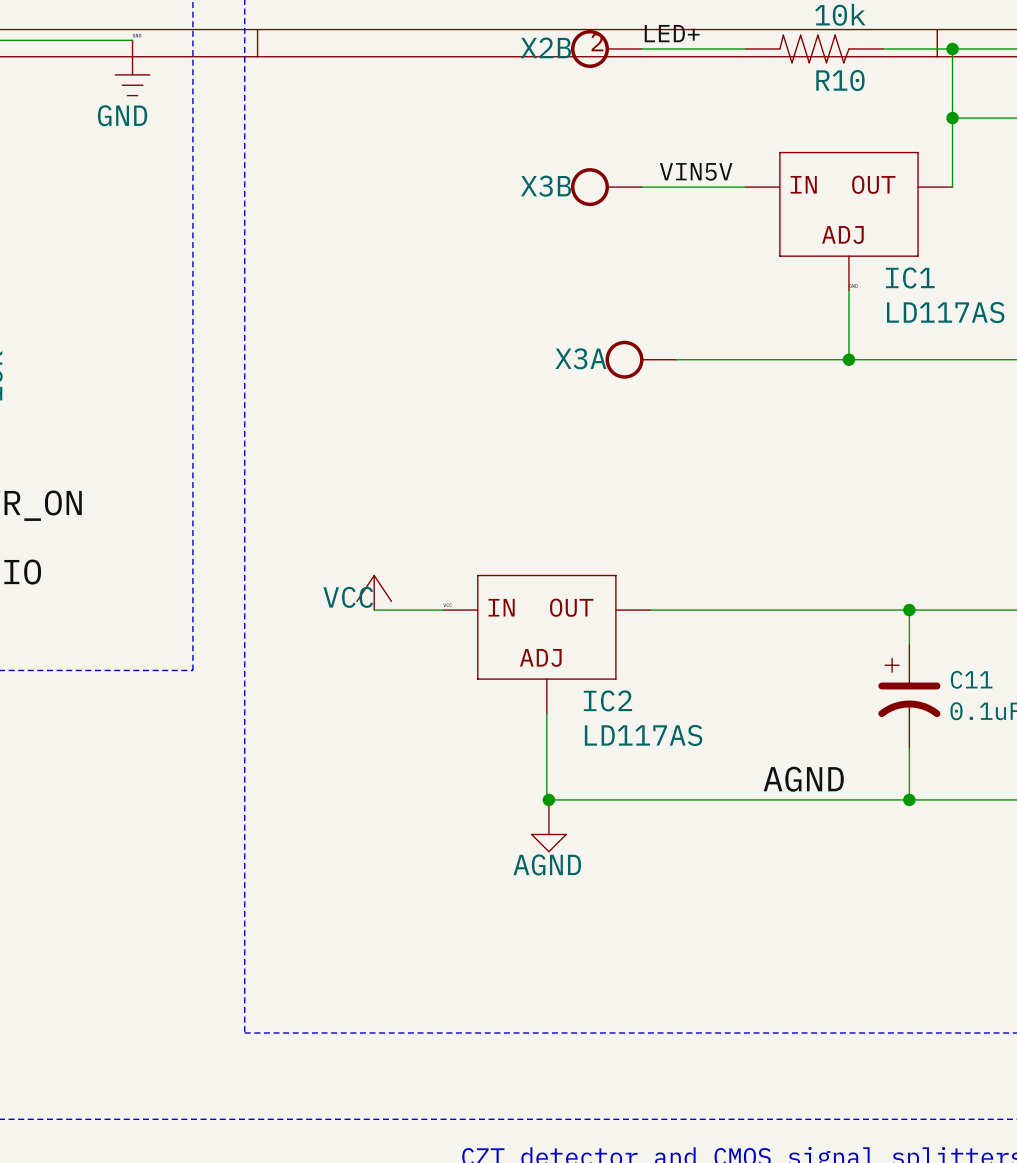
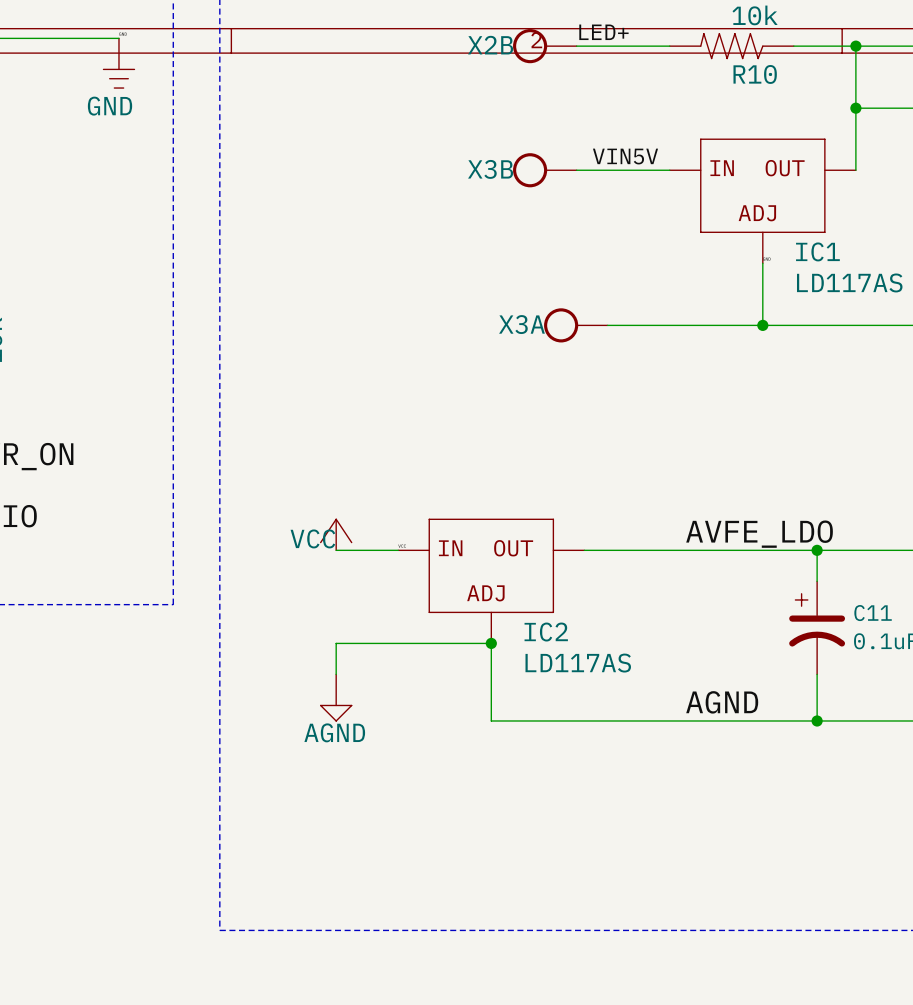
label: none -> AVFE_LDO (759, 534)
wire: none -> (491, 643) (336, 643) (336, 674)
junction: none -> (491, 643)
junction: (548, 799) -> none
power symbol position: AGND (548, 825) -> AGND (336, 697)

